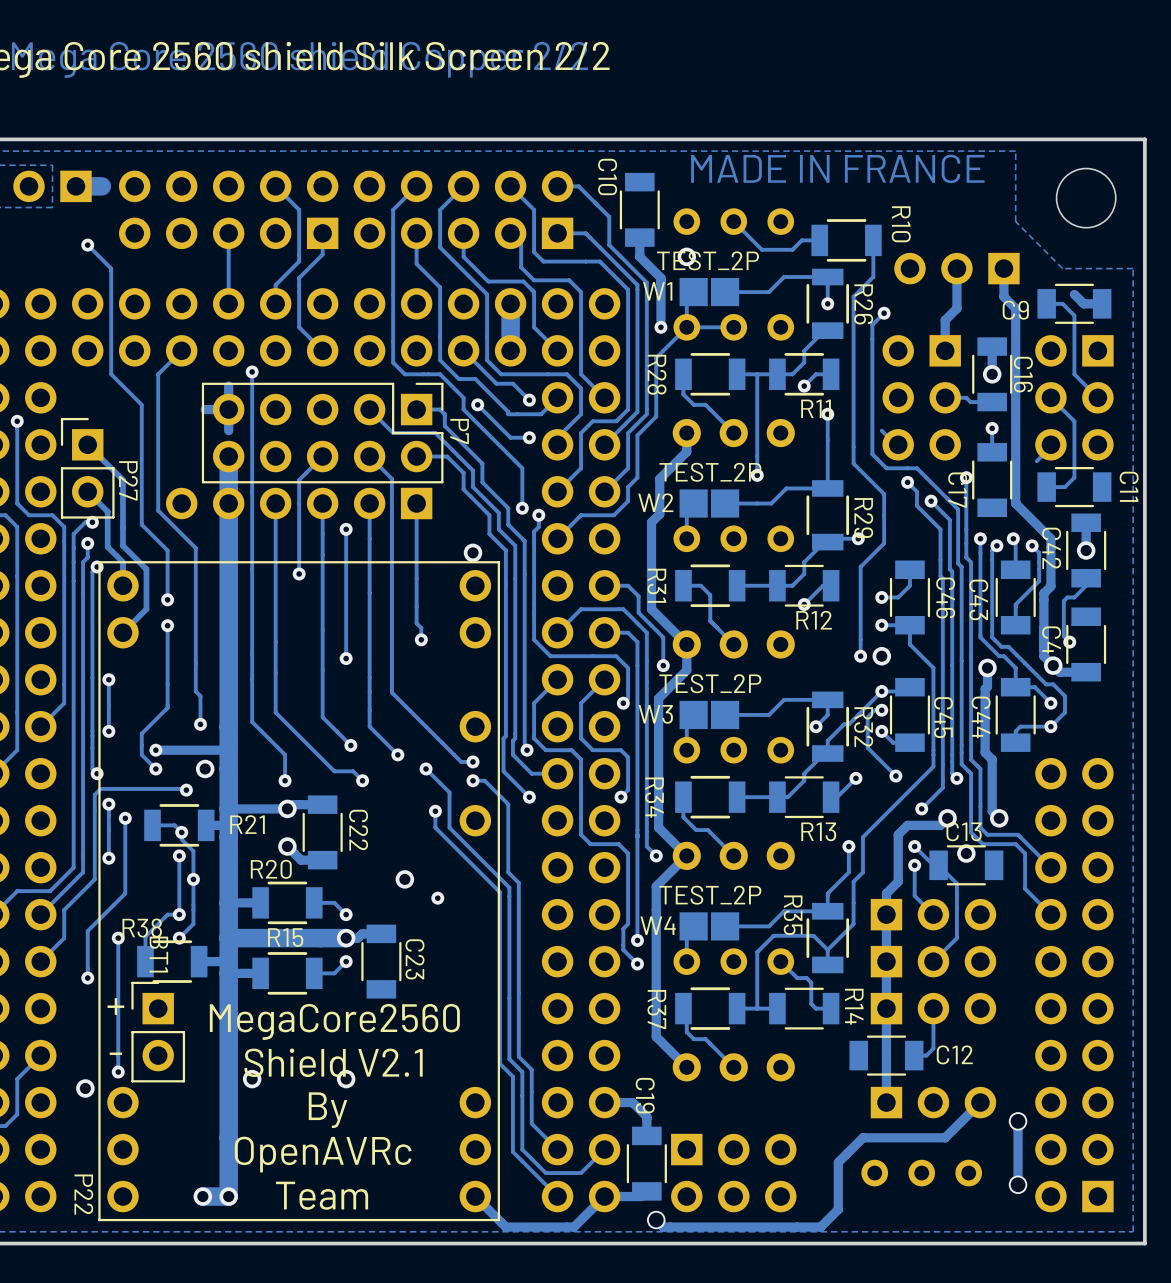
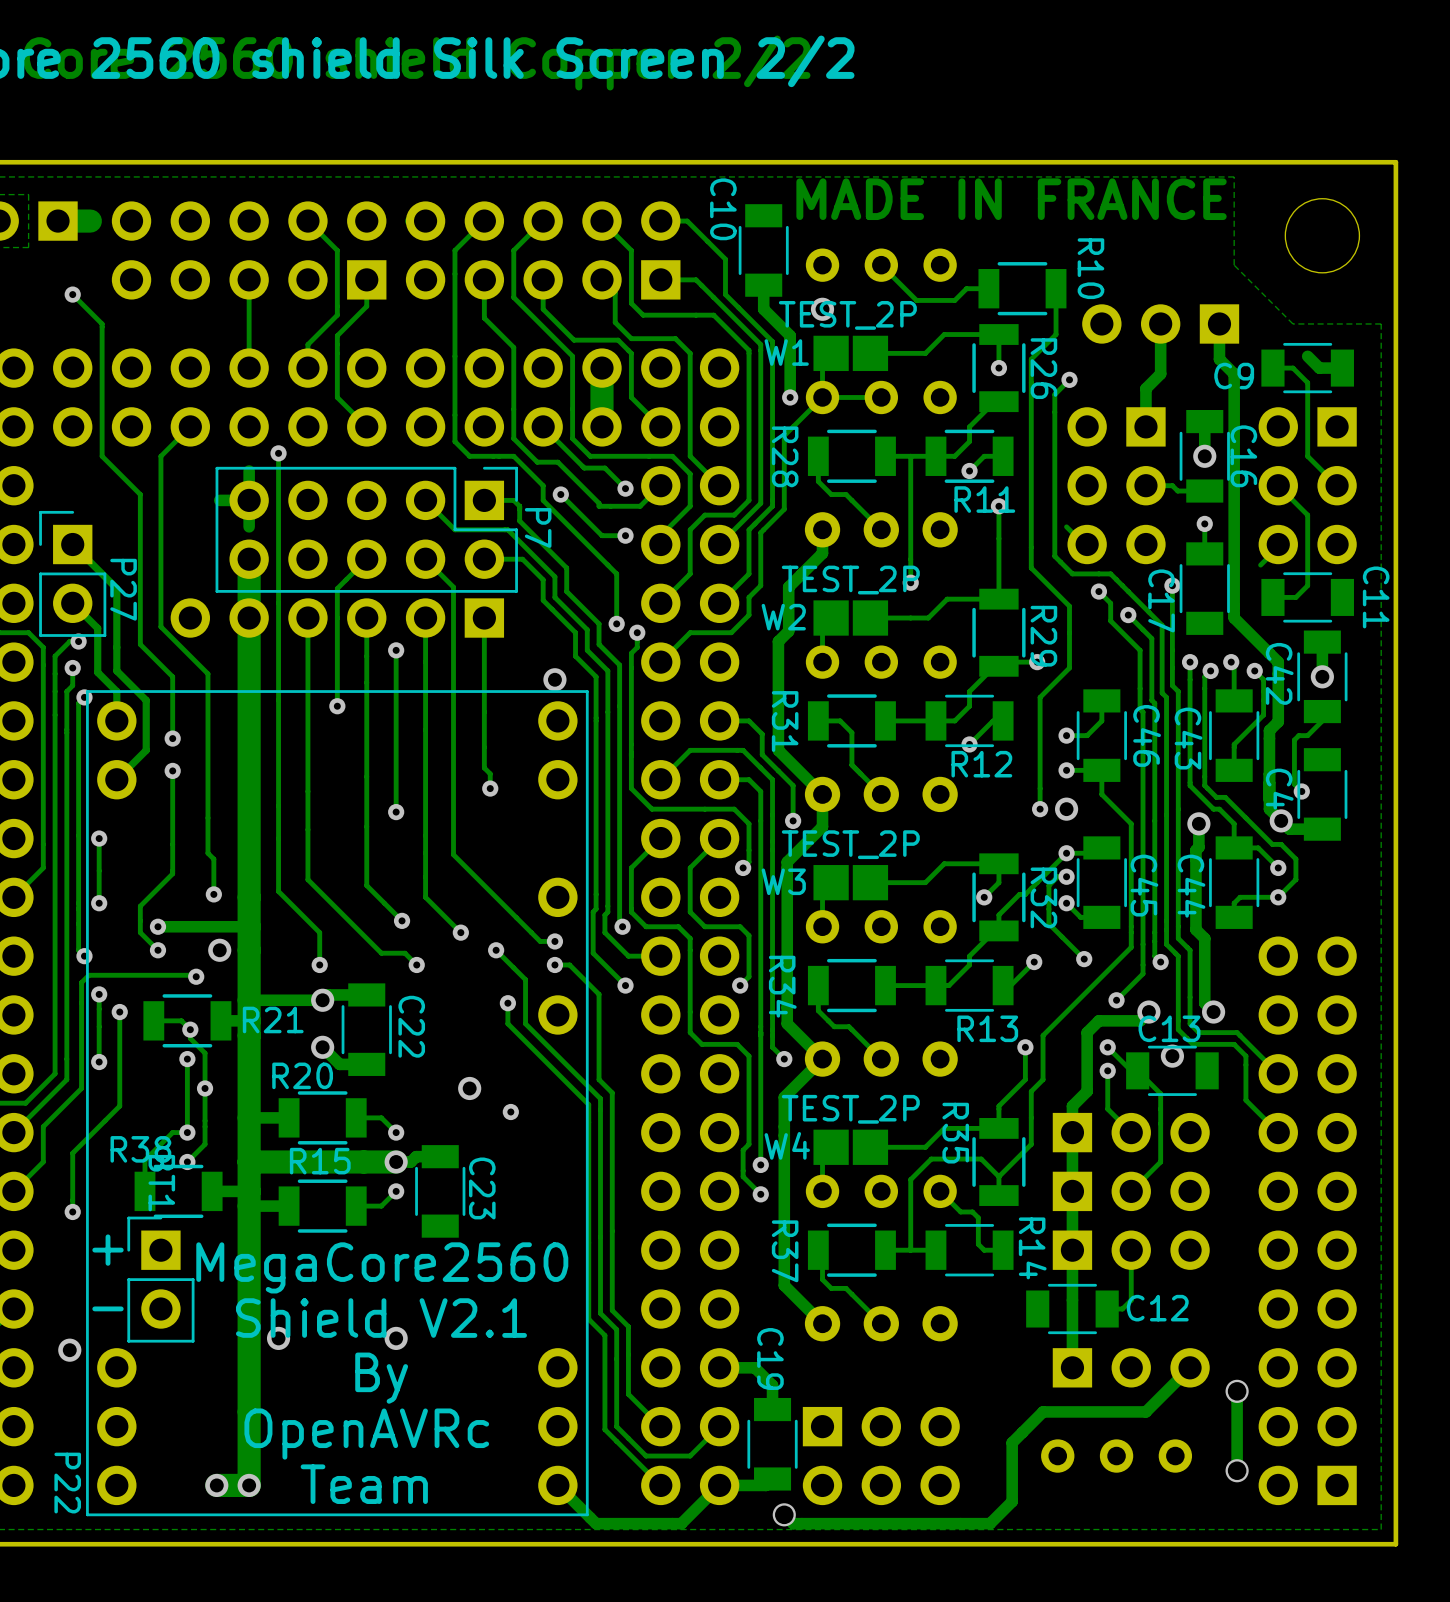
track: (118, 938) (118, 1072) -> none
via: (118, 938) -> none
via: (118, 1072) -> none

